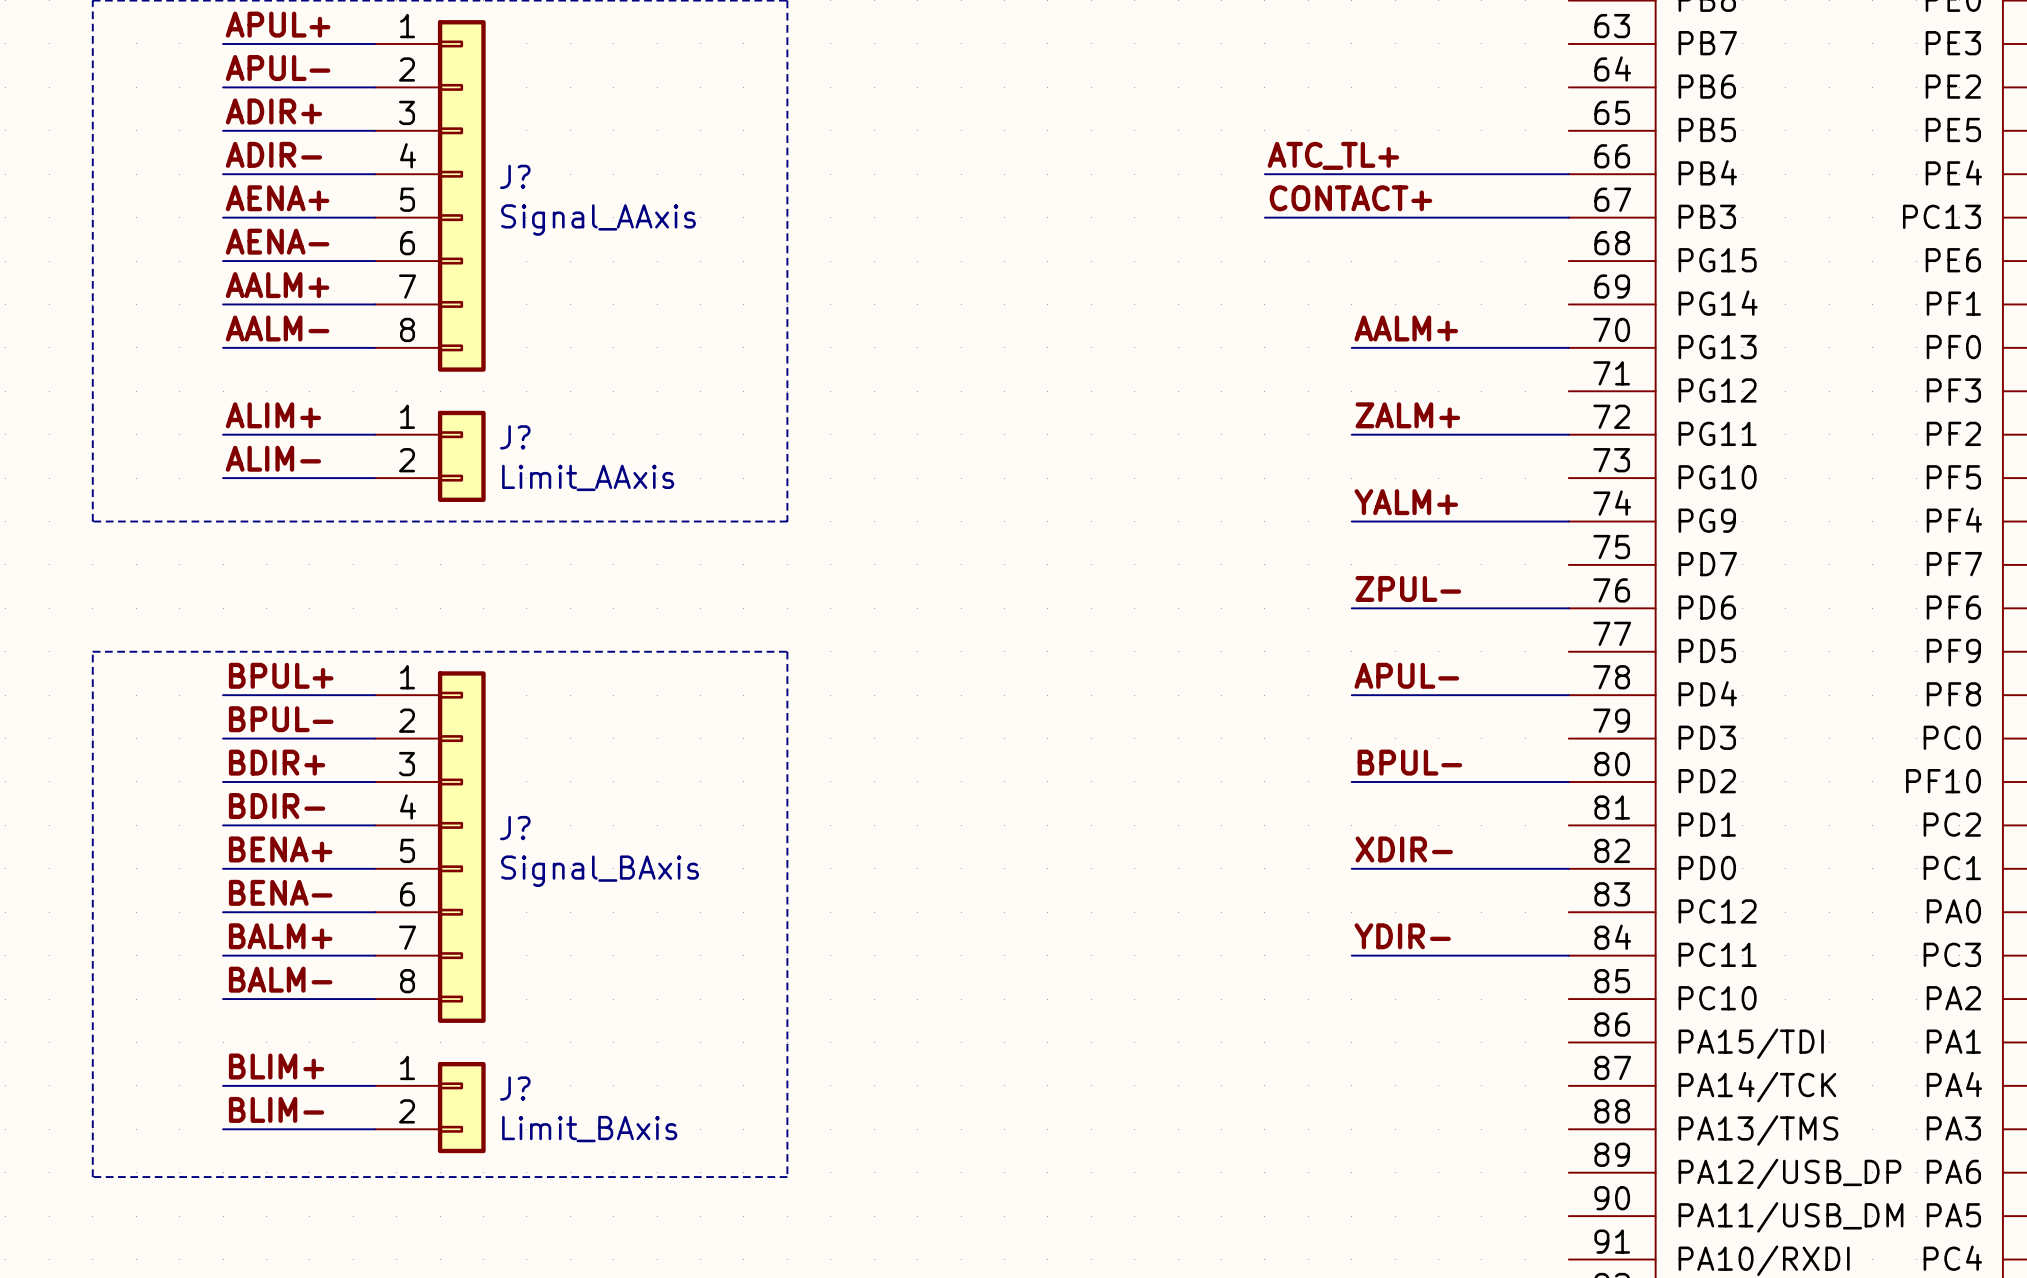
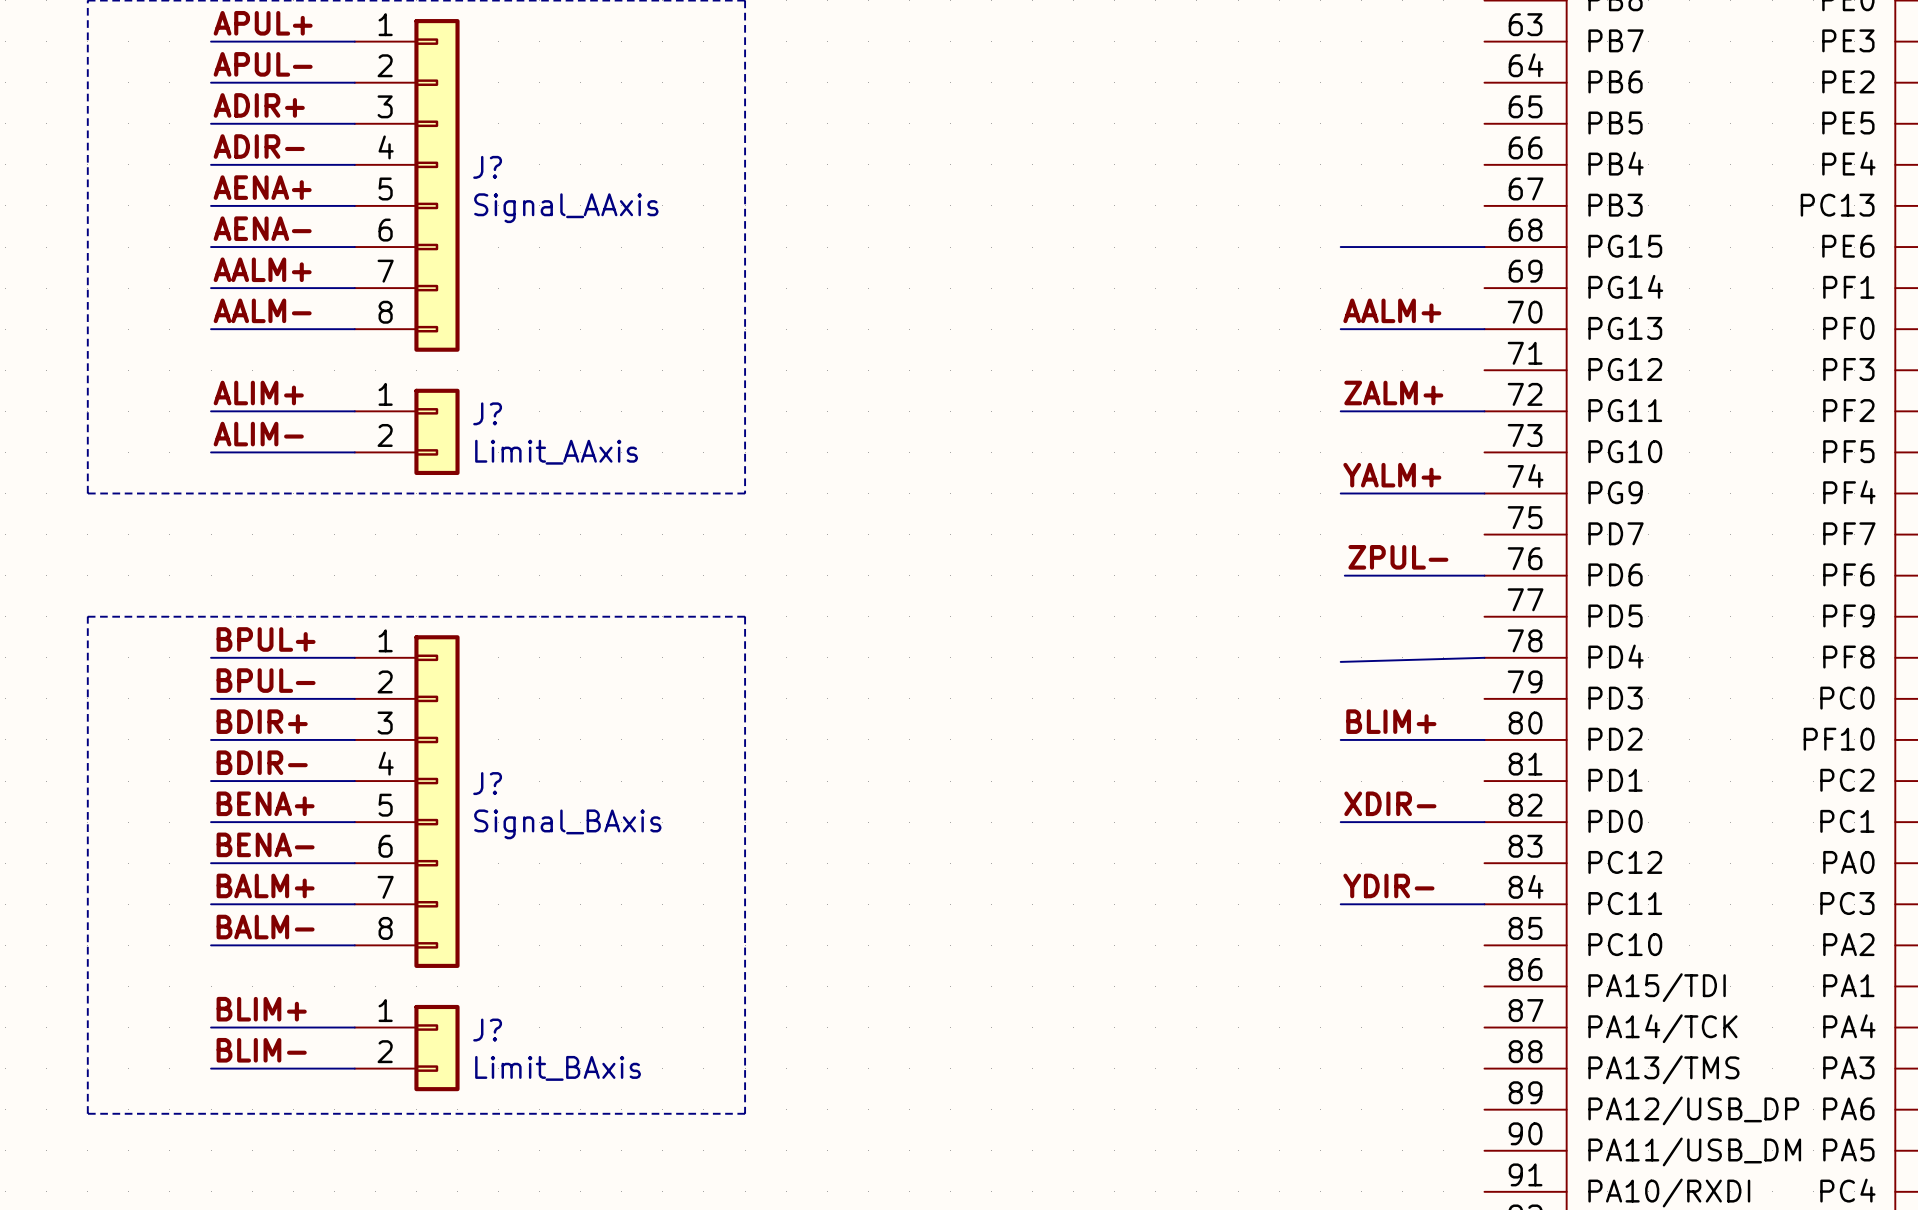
label: ATC_TL+ (1333, 155) -> none
wire: (1264, 174) (1568, 174) -> none
label: CONTACT+ (1350, 198) -> none
wire: (1264, 217) (1568, 217) -> none
wire: none -> (1340, 247) (1484, 247)
label position: AALM+ (1406, 328) -> AALM+ (1392, 310)
wire: (1351, 347) (1416, 347) -> none
label position: ZALM+ (1407, 415) -> ZALM+ (1393, 393)
wire: (1351, 434) (1416, 434) -> none
label position: YALM+ (1406, 502) -> YALM+ (1392, 475)
wire: (1351, 521) (1416, 521) -> none
label position: ZPUL- (1408, 588) -> ZPUL- (1398, 557)
wire: (1351, 608) (1421, 608) -> none
label: APUL- (1406, 675) -> none
wire: (1351, 695) (1568, 695) -> (1340, 661) (1484, 657)
label: BPUL- (1409, 762) -> none
label: none -> BLIM+ (1391, 721)
wire: (1351, 781) (1416, 781) -> none
label position: XDIR- (1404, 849) -> XDIR- (1390, 803)
wire: (1351, 868) (1416, 868) -> none
label position: YDIR- (1402, 936) -> YDIR- (1388, 885)
wire: (1351, 955) (1416, 955) -> none

